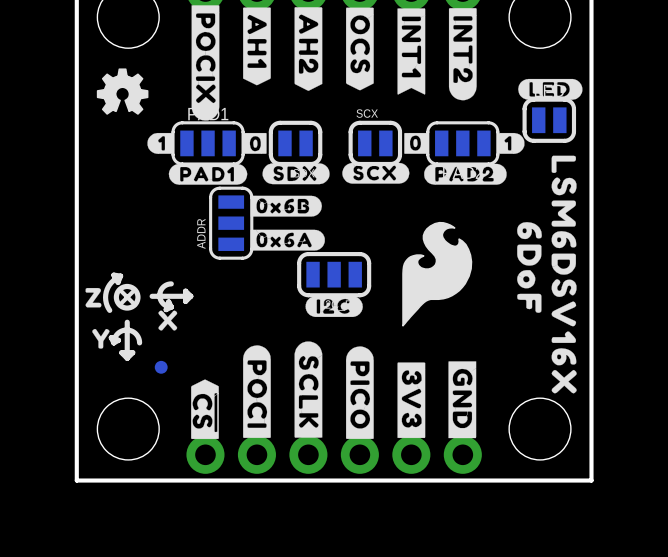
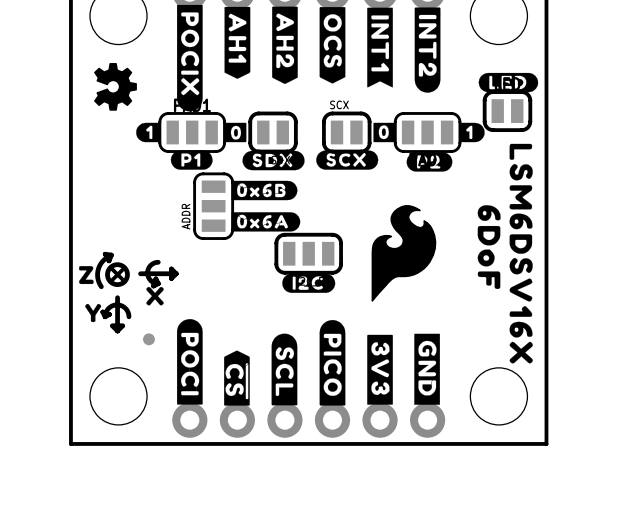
drawing shape: [96, 68, 149, 115] -> [94, 63, 137, 111]
drawing shape: [168, 163, 248, 185] -> [170, 150, 213, 170]
drawing shape: [424, 163, 507, 185] -> [406, 152, 453, 172]
drawing shape: [294, 341, 323, 438] -> [271, 333, 298, 406]
drawing position: (256, 391) -> (189, 361)
drawing position: (204, 409) -> (236, 378)

